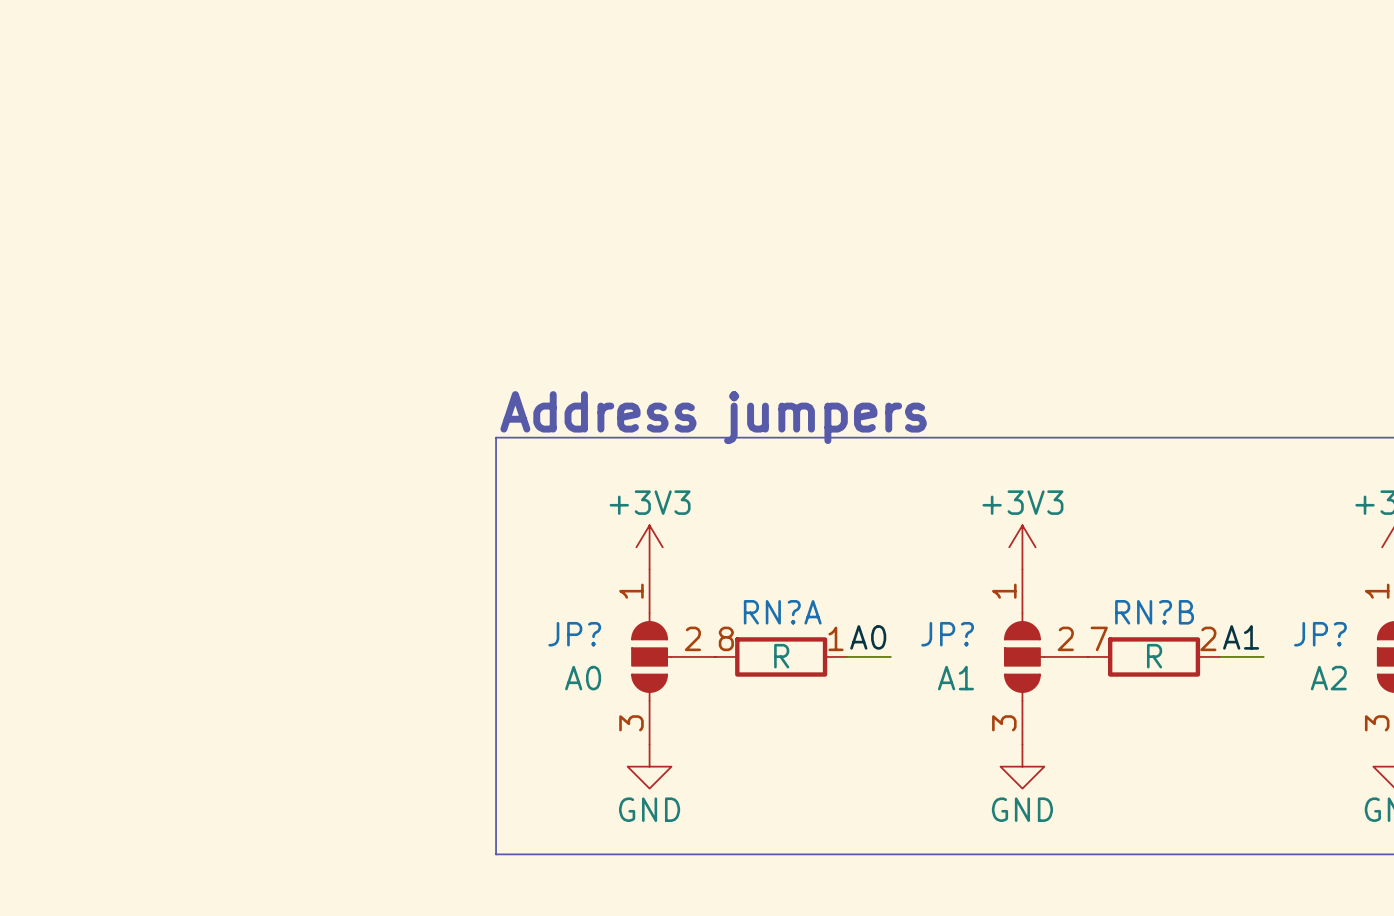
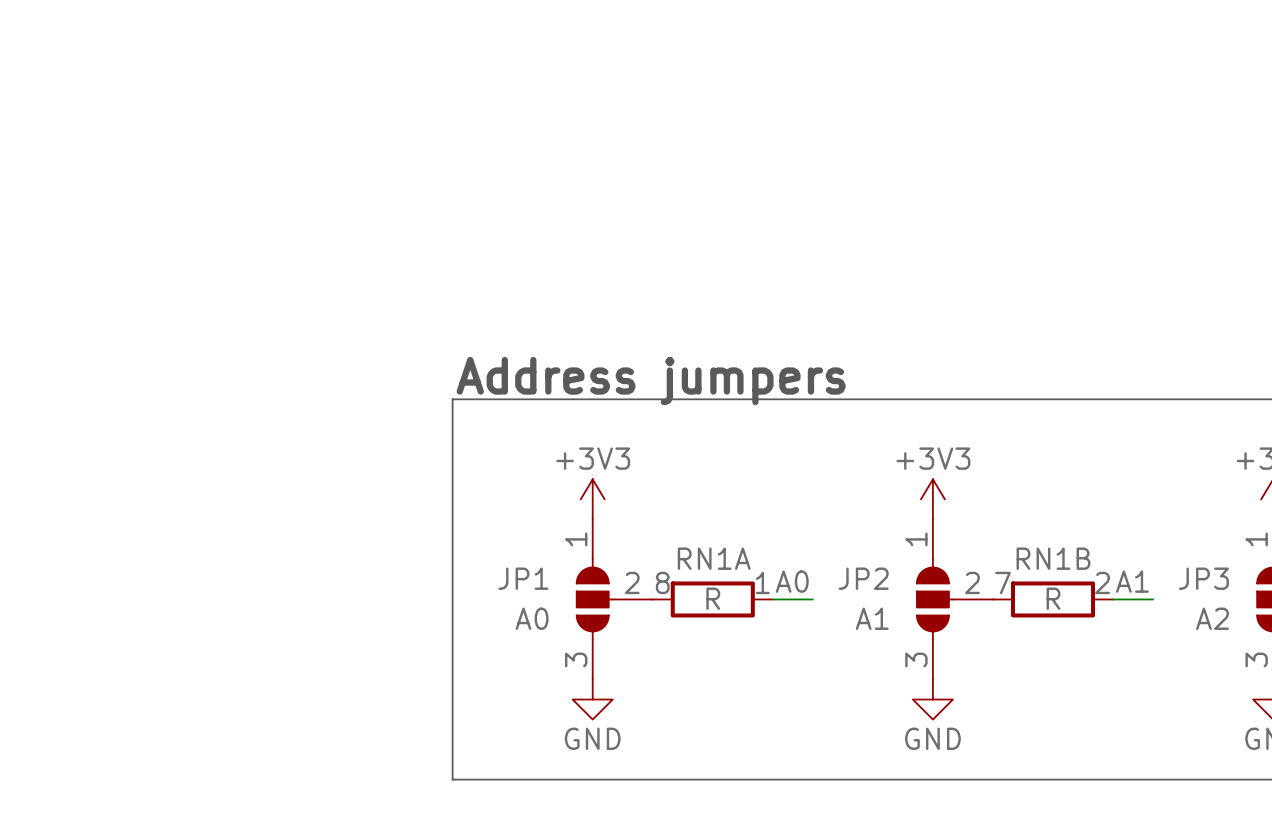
RN?A name: RN?A (782, 612) -> RN1A (714, 558)
RN?B name: RN?B (1154, 612) -> RN1B (1053, 558)
JP? name: JP? (574, 634) -> JP1 (523, 578)
JP? name: JP? (947, 634) -> JP2 (863, 578)
JP? name: JP? (1320, 634) -> JP3 (1203, 578)

